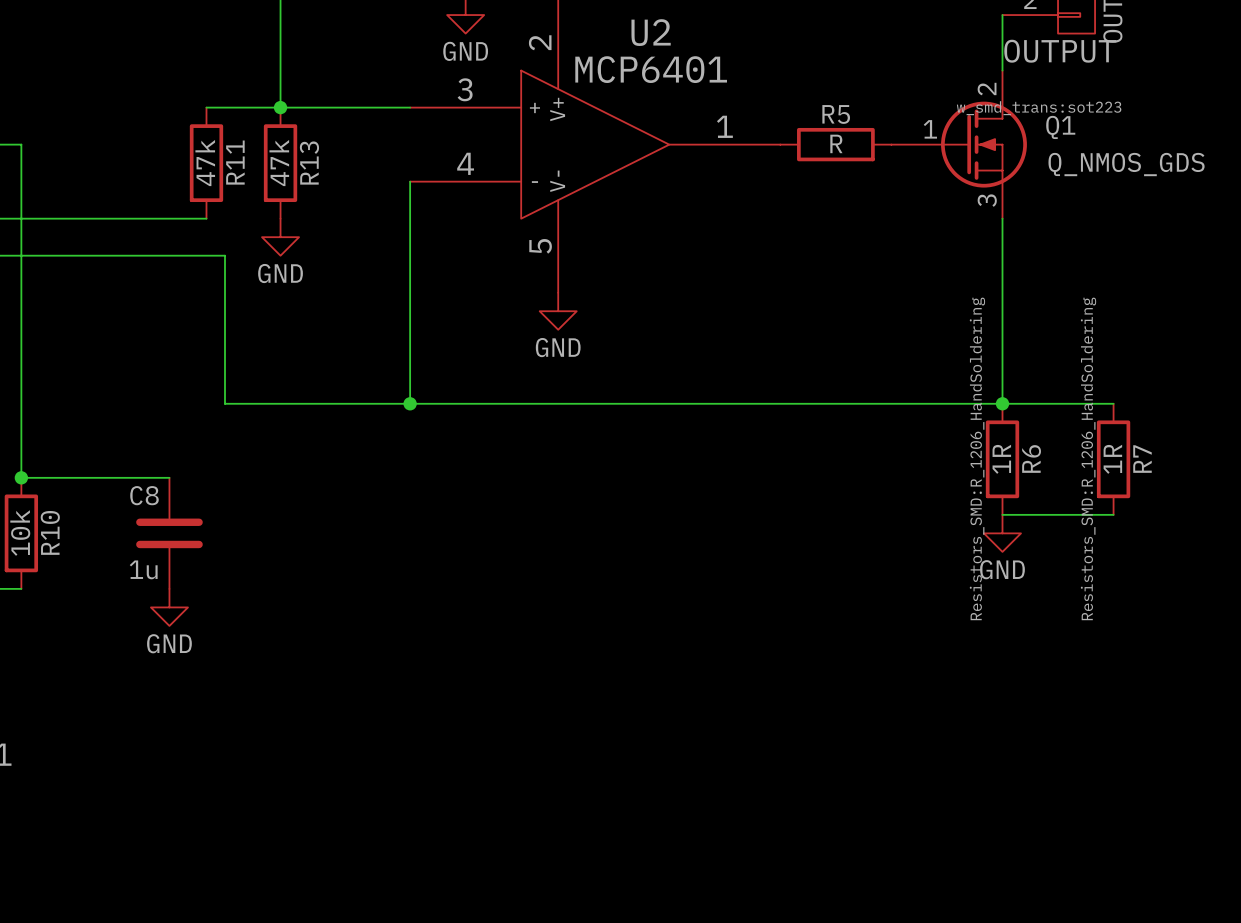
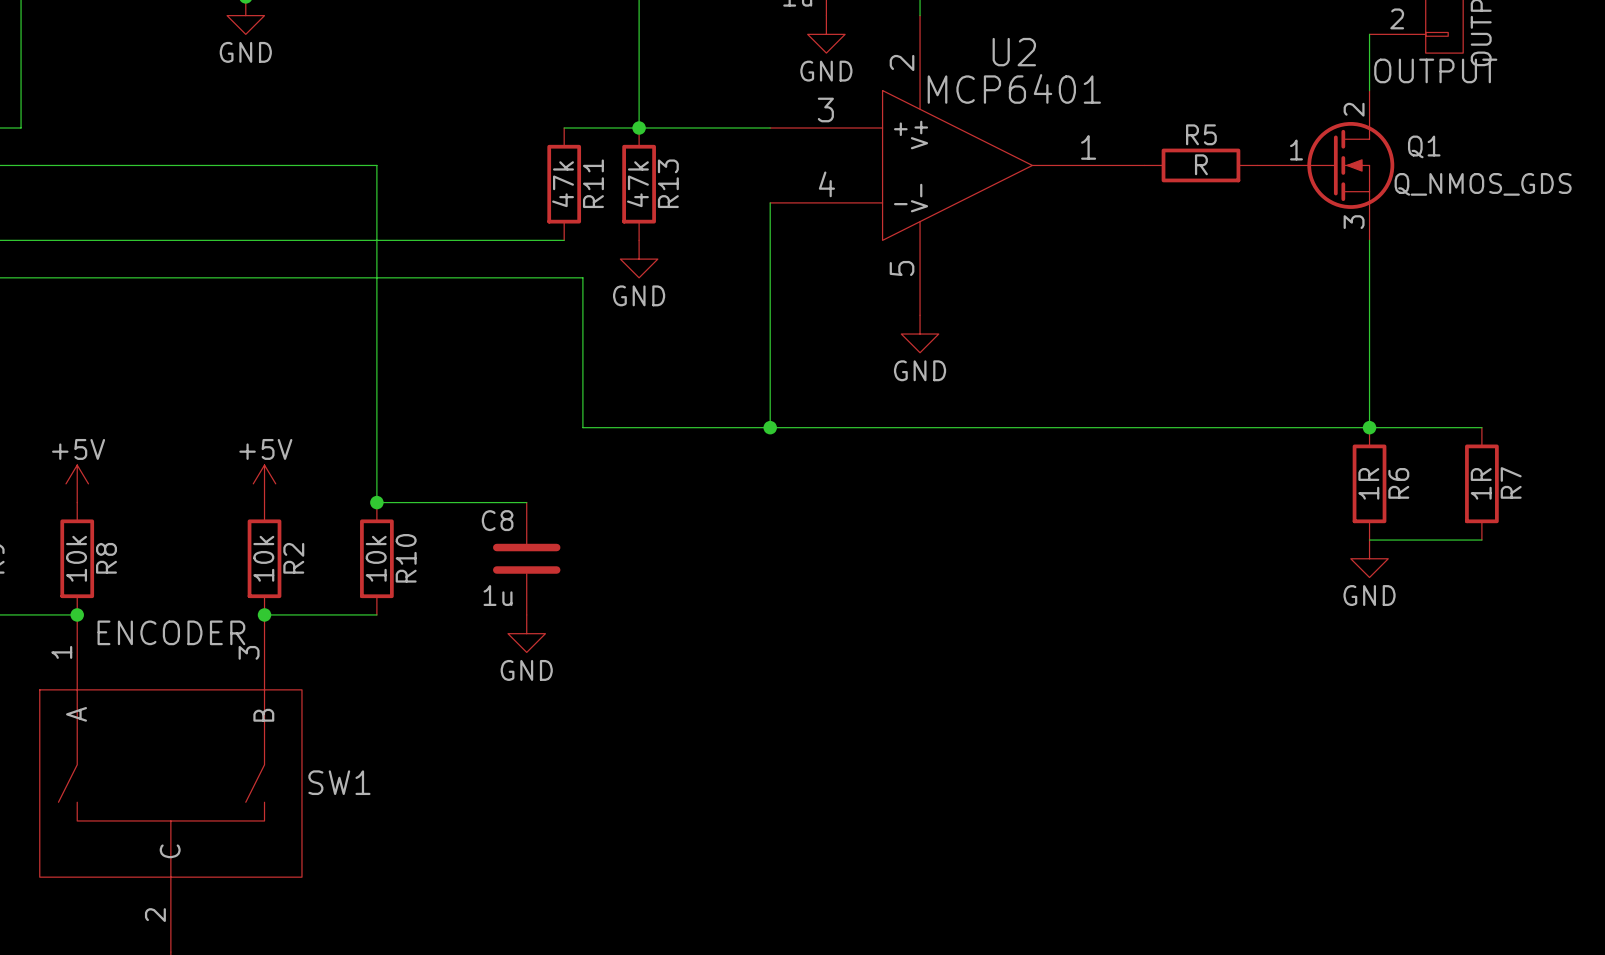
Q1 text: w_smd_trans:sot223 (1039, 108) -> none
R6 text: Resistors_SMD:R_1206_HandSoldering (977, 458) -> none
R7 text: Resistors_SMD:R_1206_HandSoldering (1088, 458) -> none

